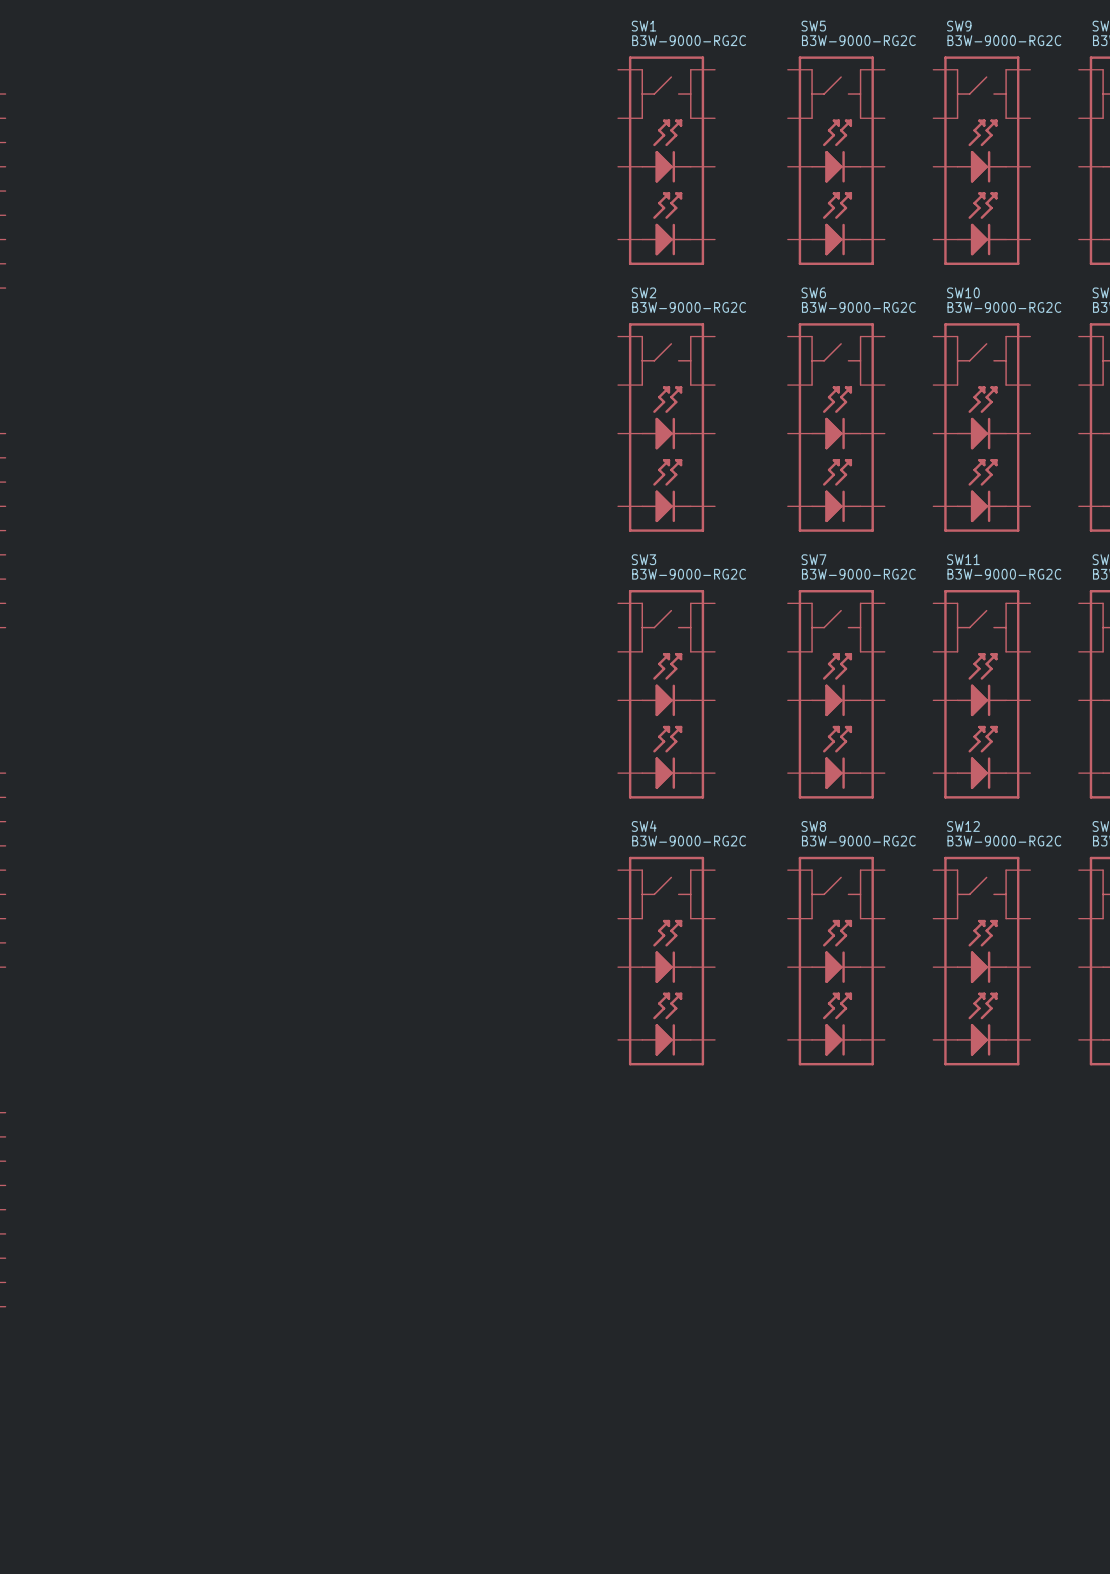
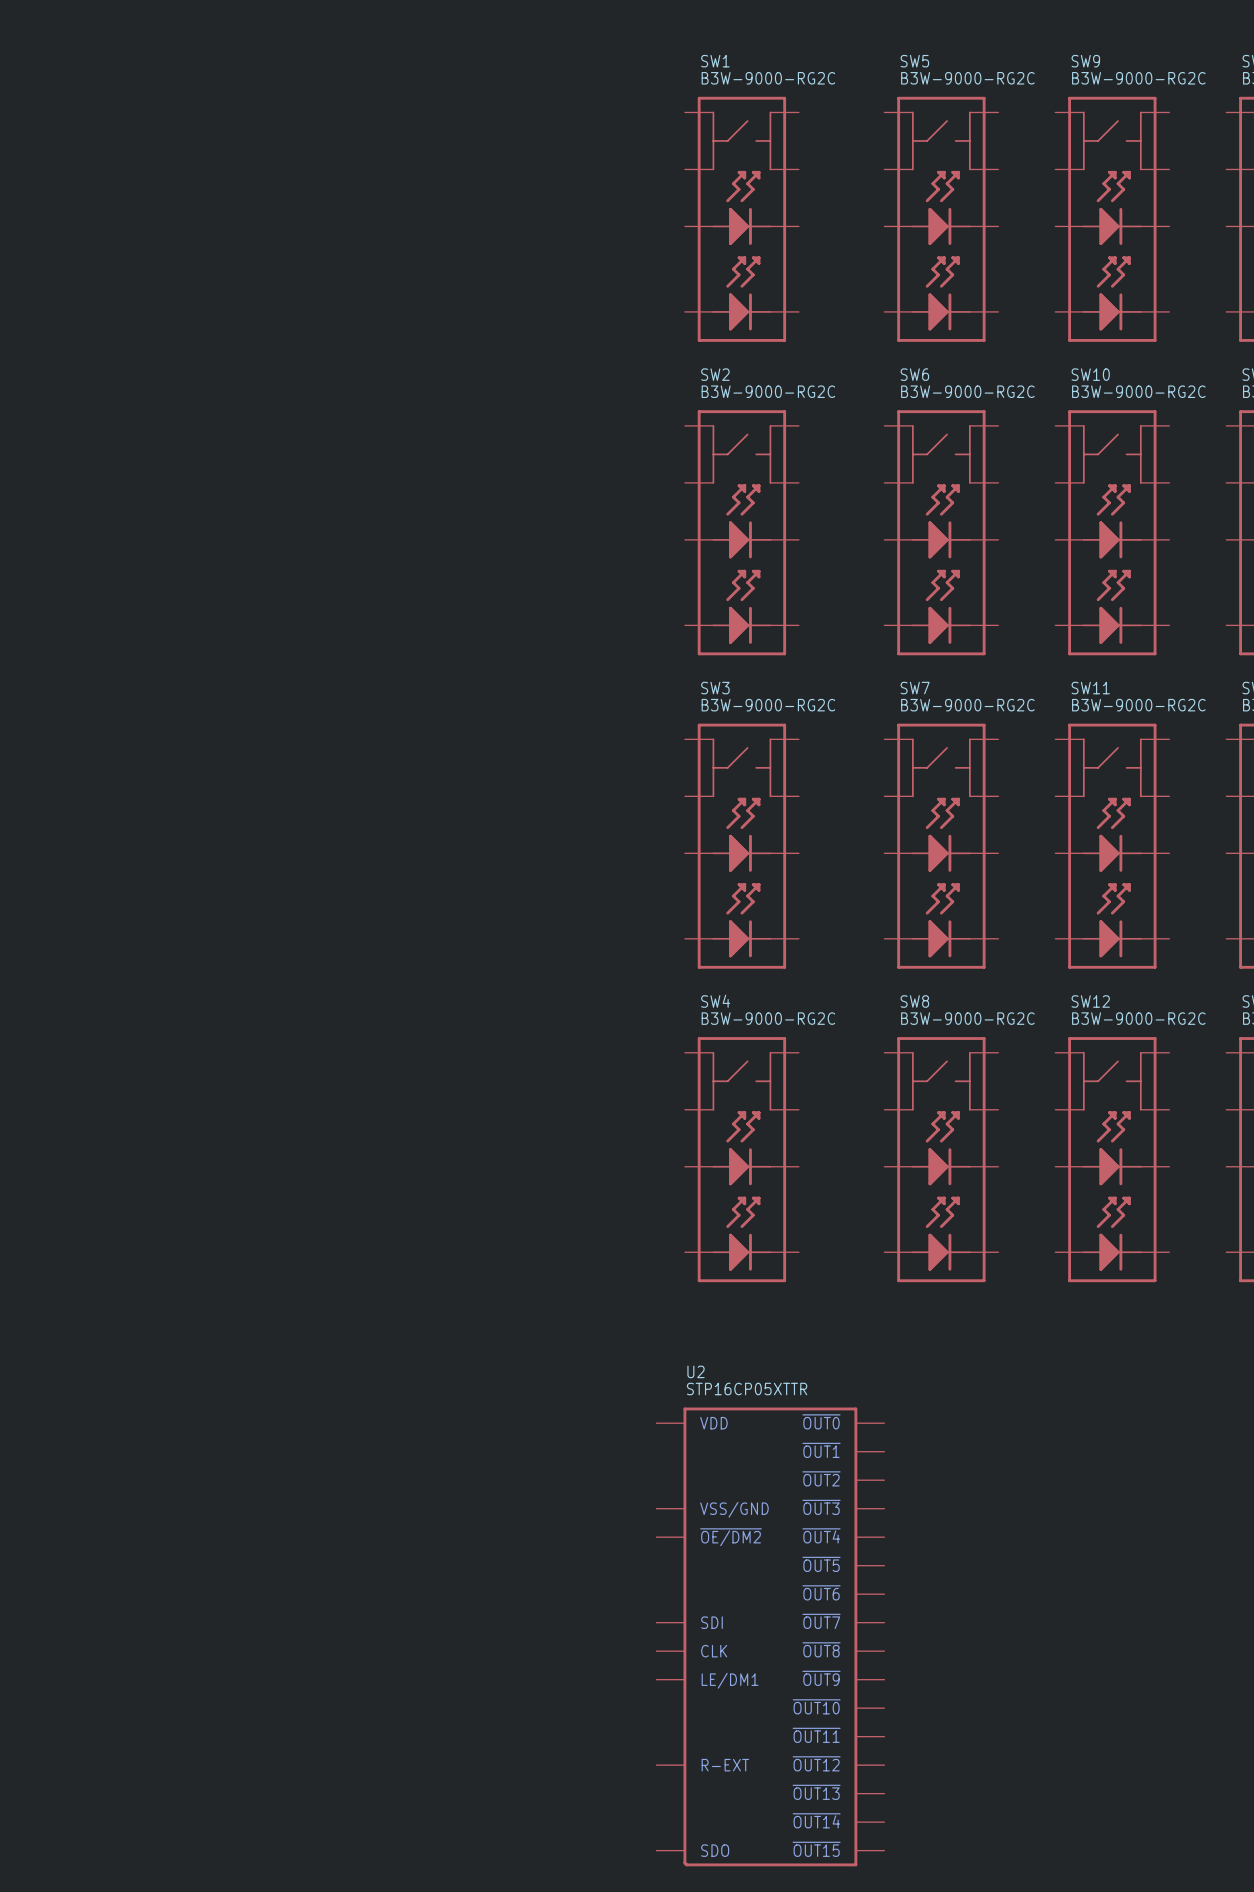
U2: none -> STP16CP05XTTR (770, 1636)

